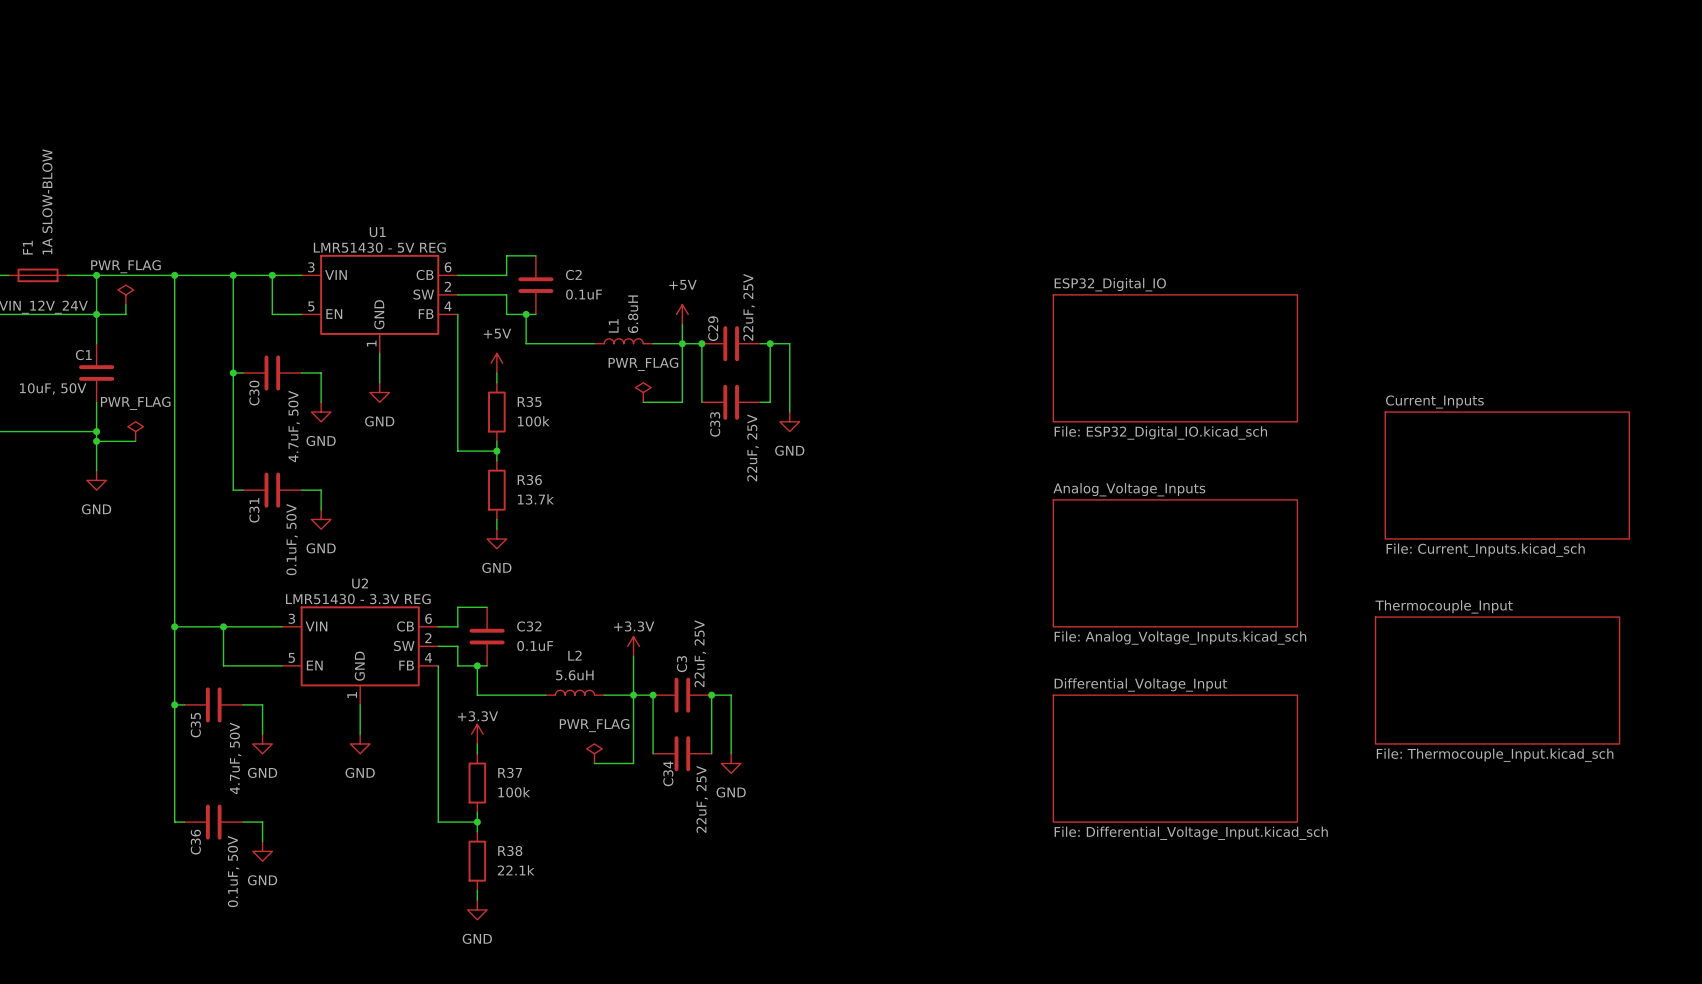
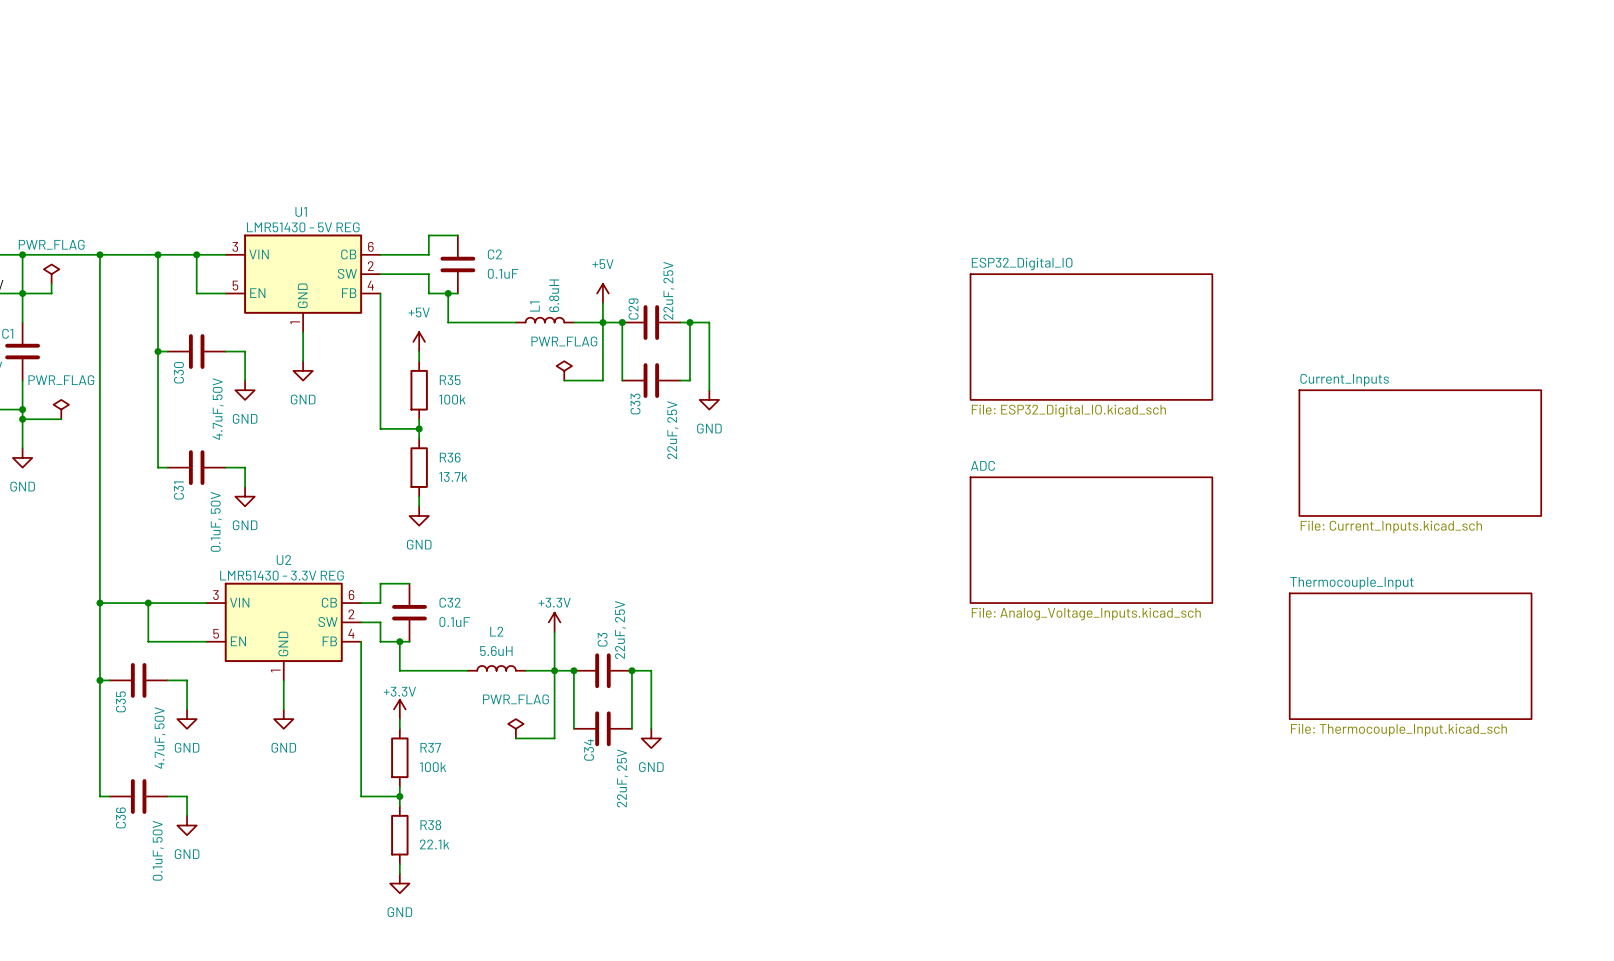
sheet Analog_Voltage_Inputs name: Analog_Voltage_Inputs (1129, 489) -> ADC (982, 465)
sheet Differential_Voltage_Input: File: Differential_Voltage_Input.kicad_sch (1175, 758) -> none

